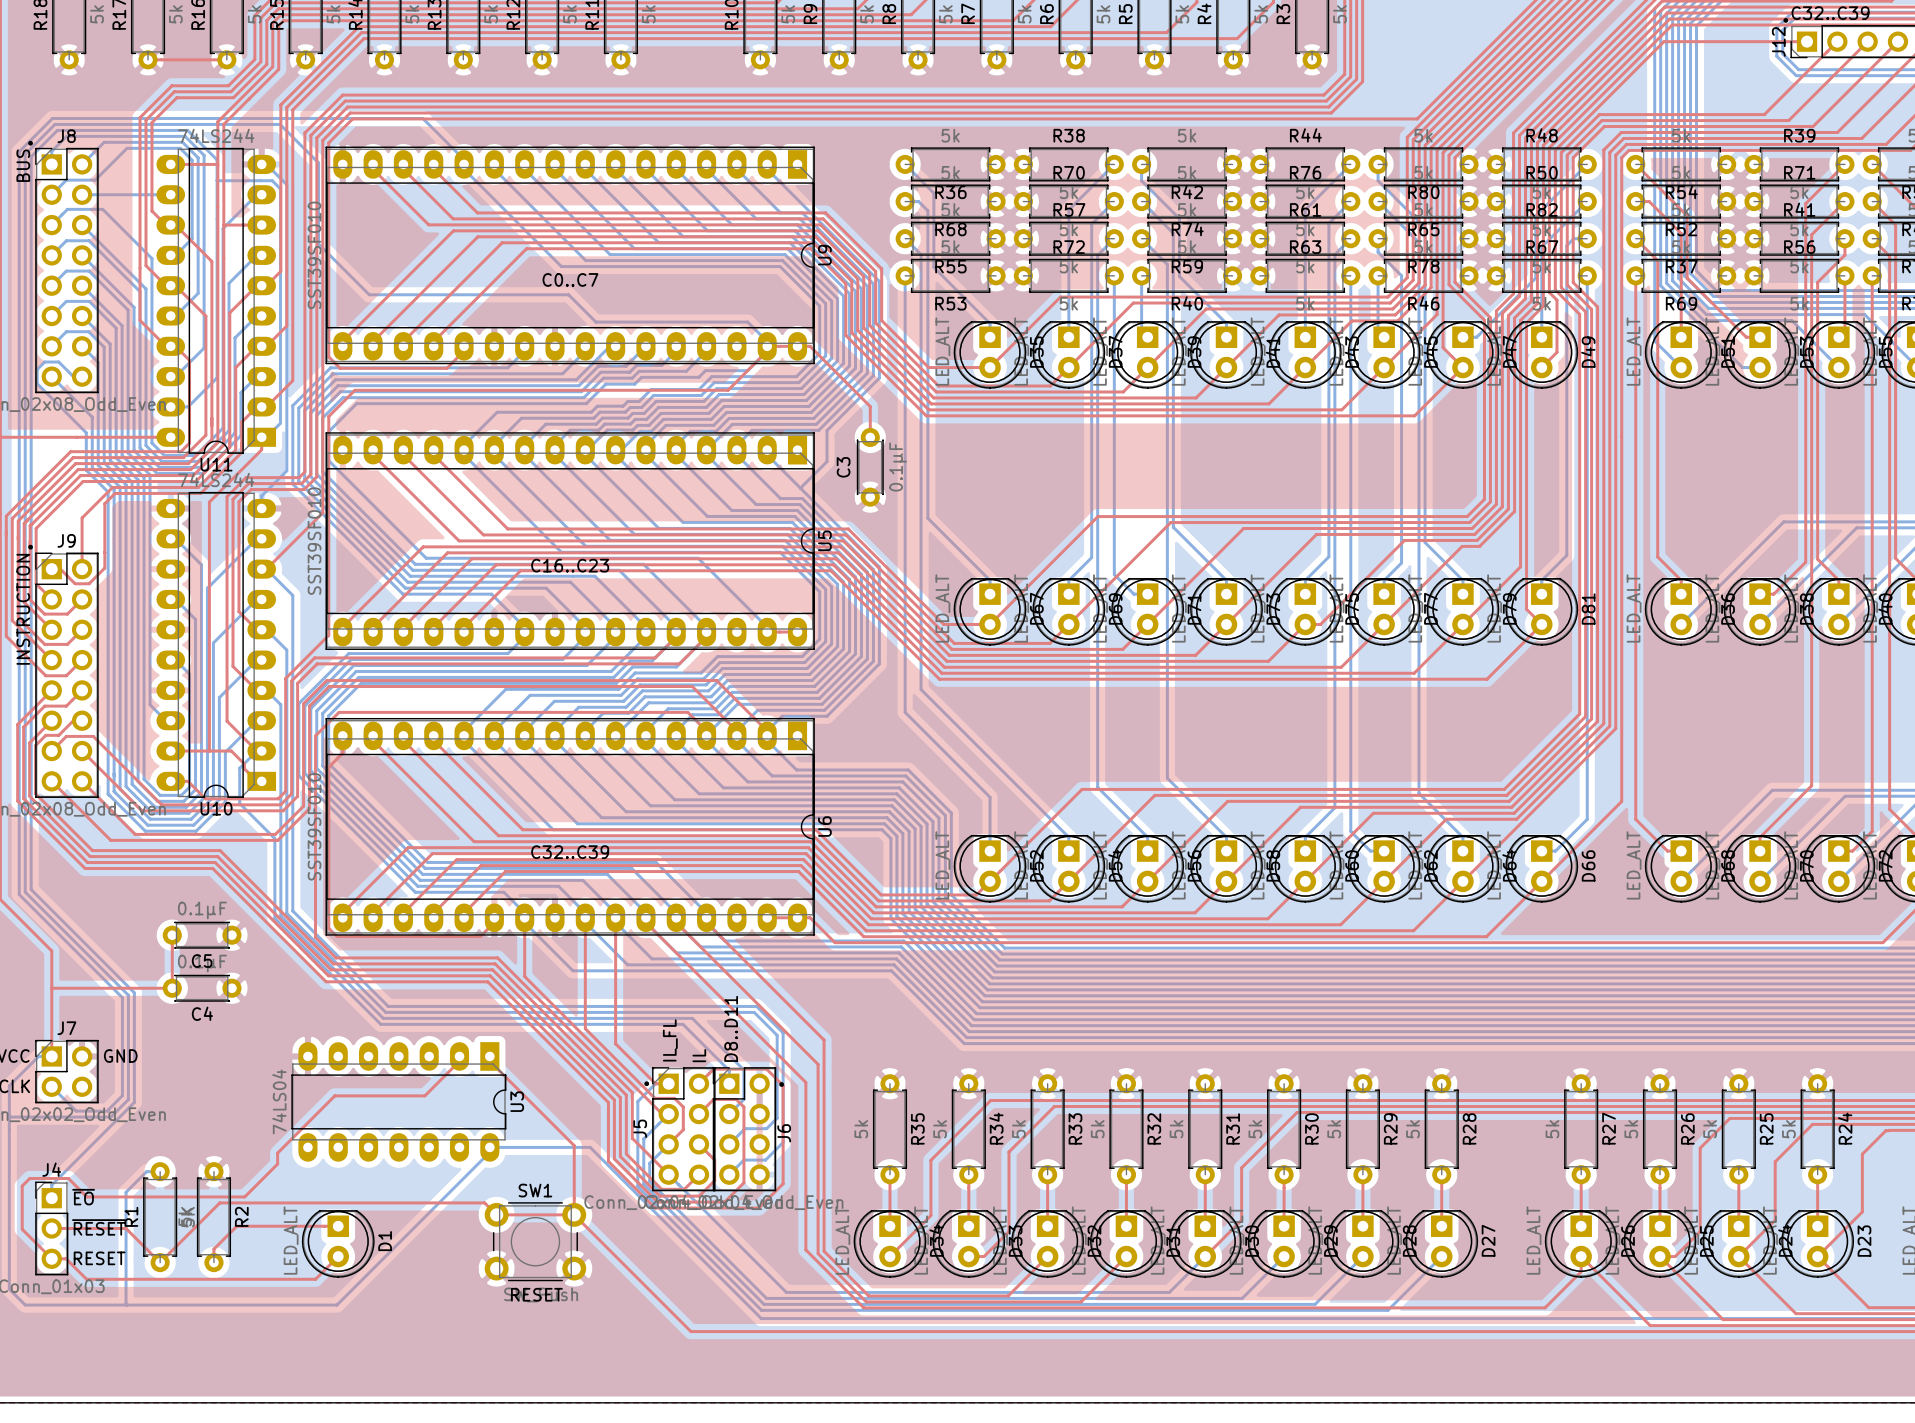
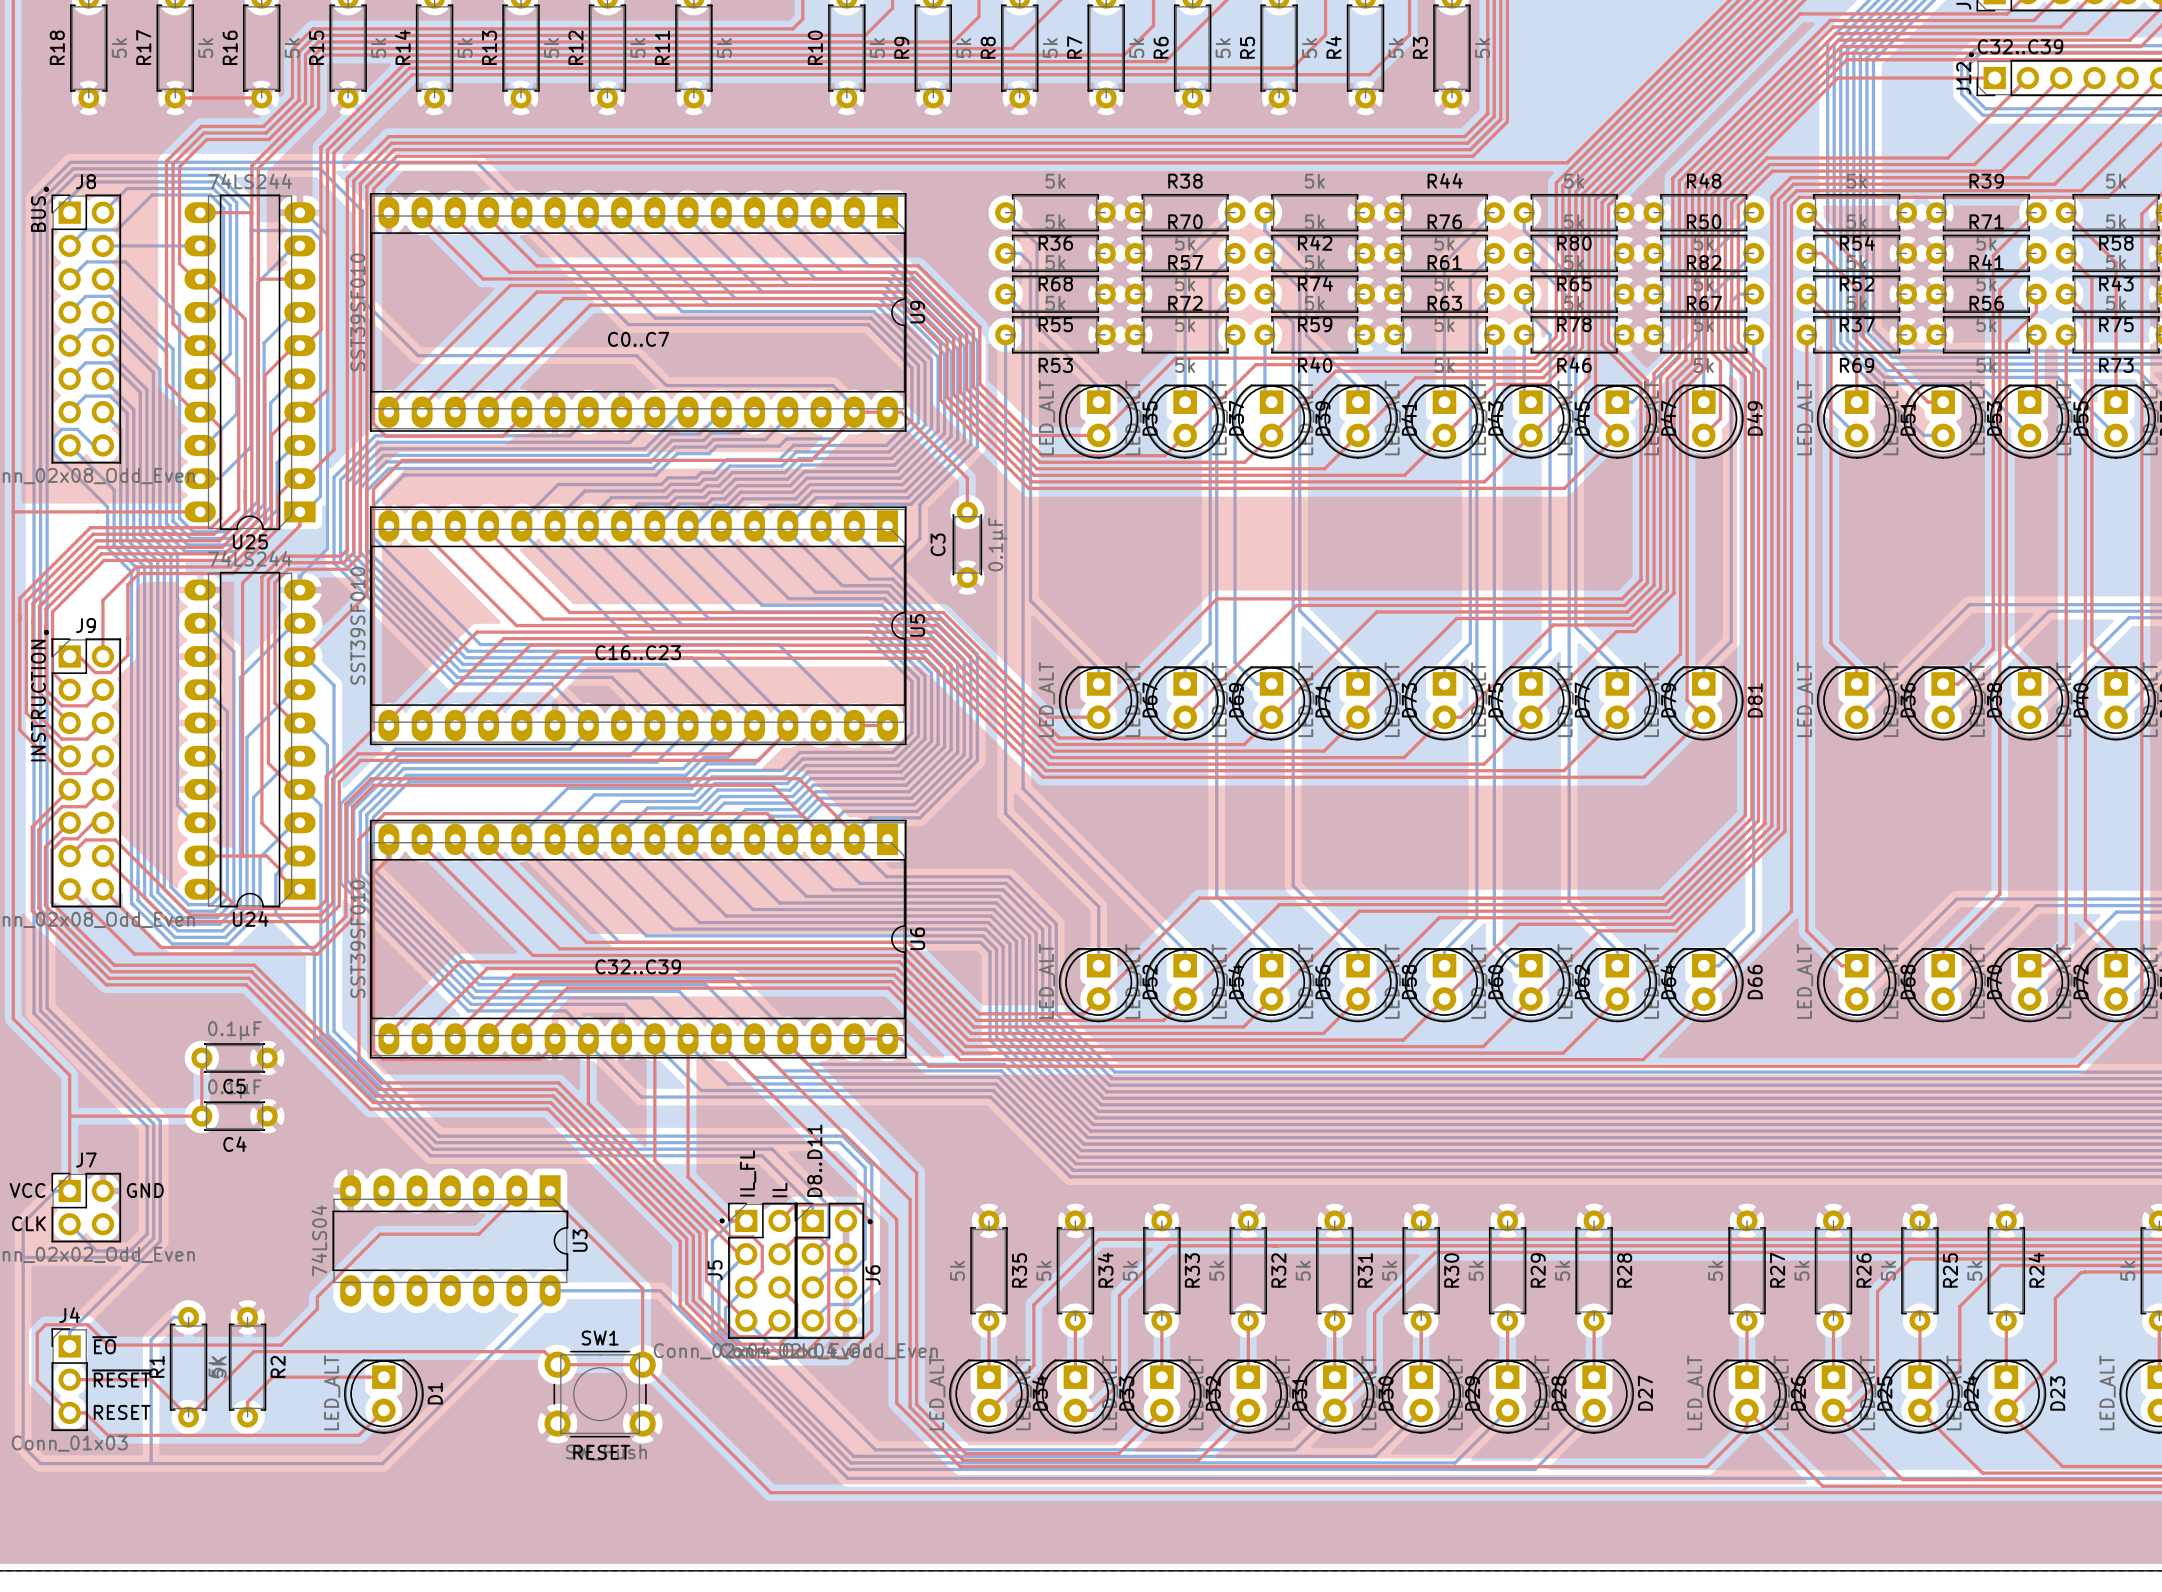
U11 name: U11 (216, 464) -> U25 (250, 541)
U10 name: U10 (216, 808) -> U24 (250, 918)

